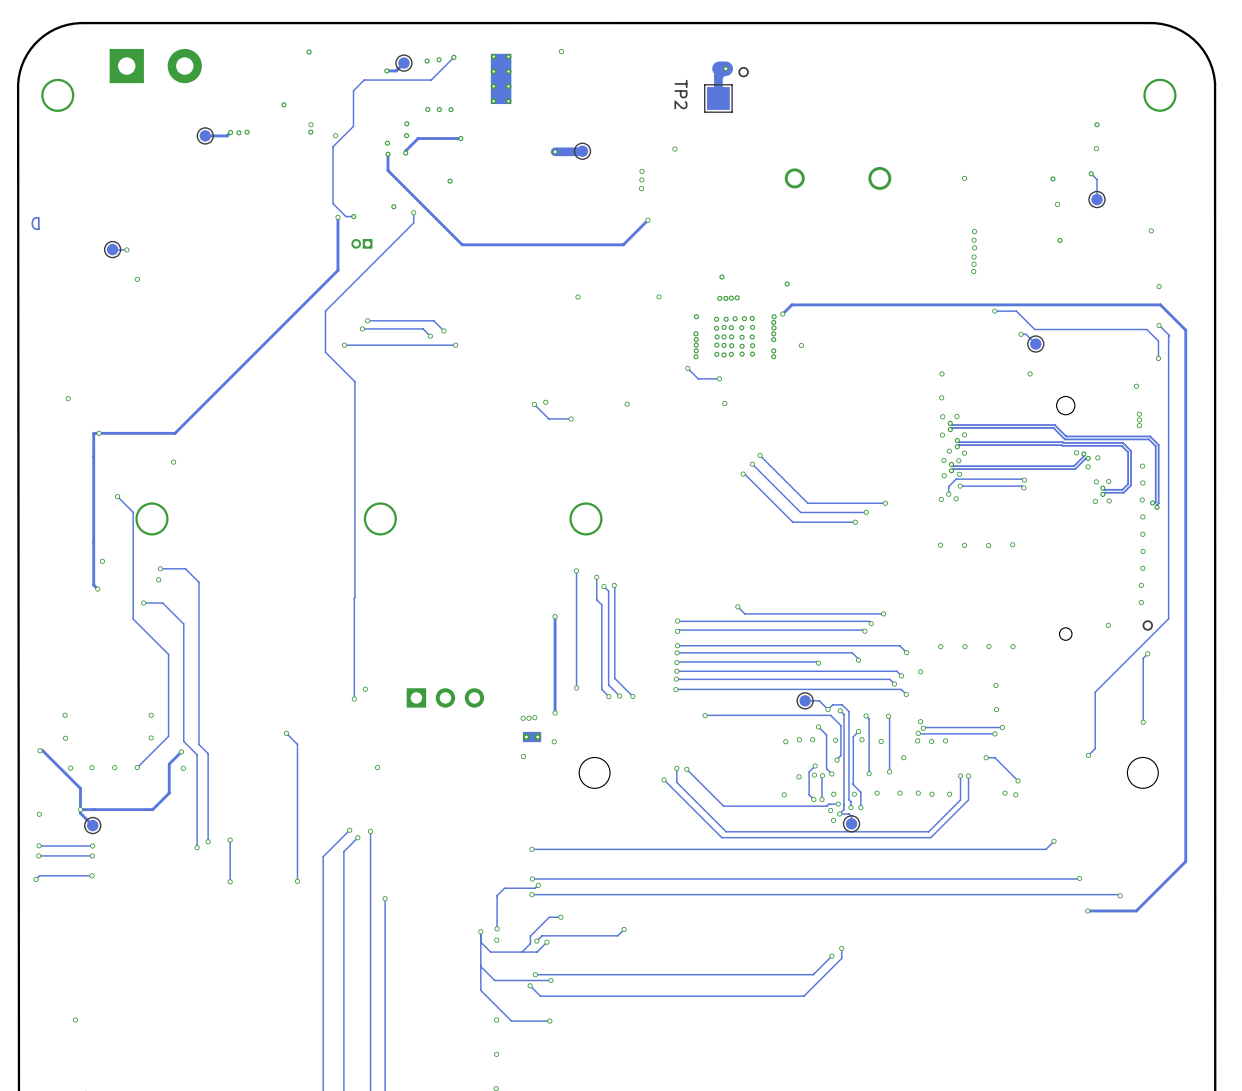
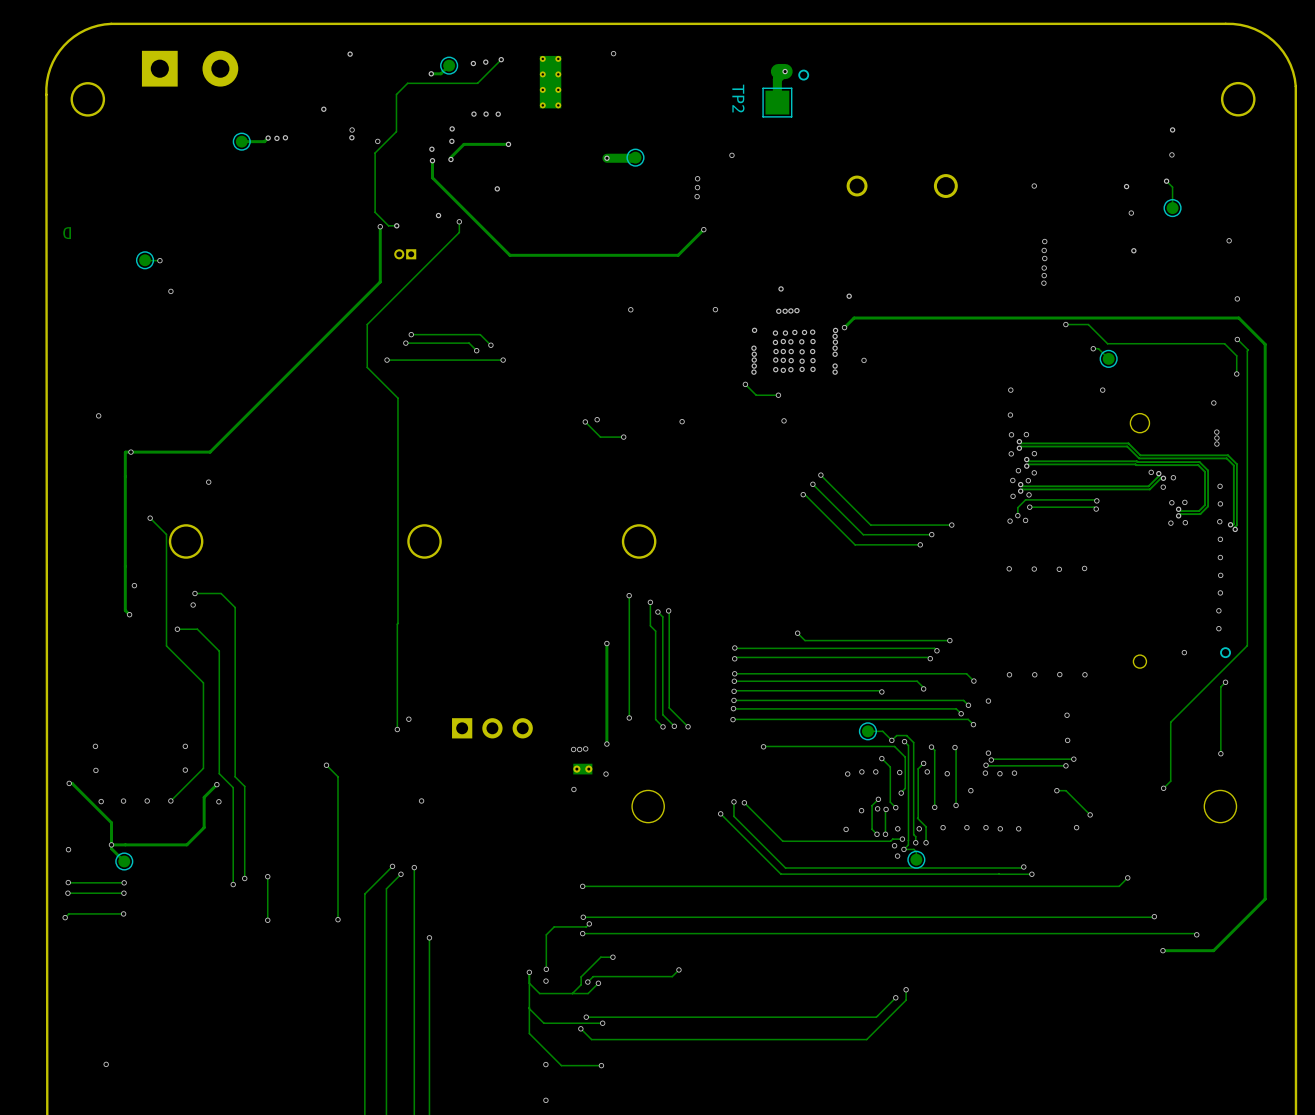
track: (960, 775) (960, 799) (928, 831) -> (1023, 866) (996, 868)
via: (960, 775) -> none
track: (968, 775) (968, 799) (930, 837) -> (1031, 874) (999, 874)
via: (968, 775) -> none
via: (1015, 794) -> none
via: none -> (1023, 866)
via: none -> (1031, 874)

